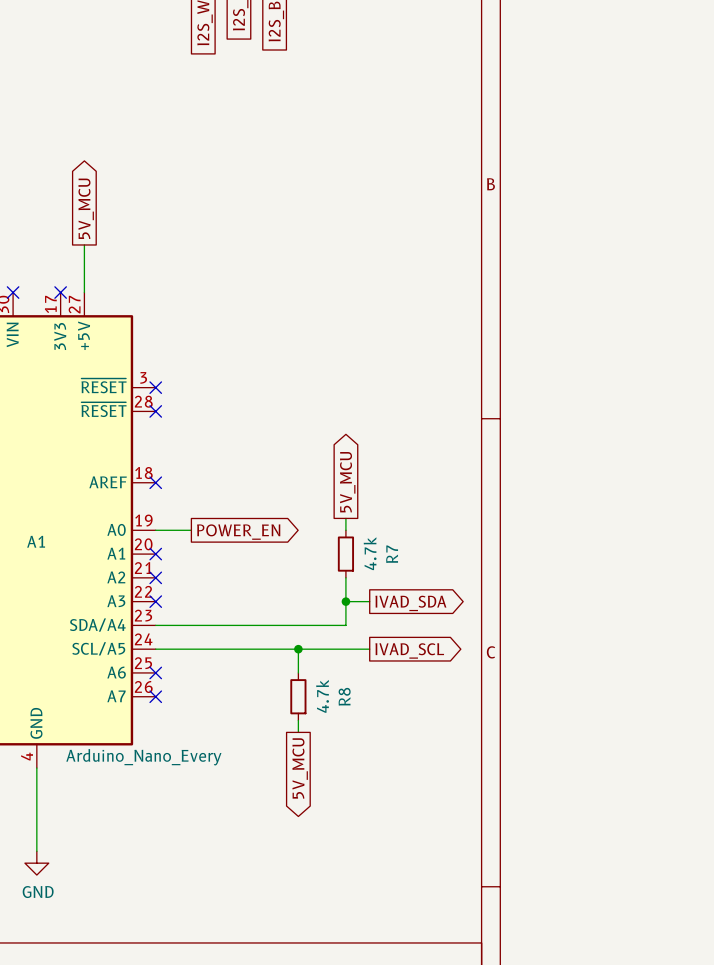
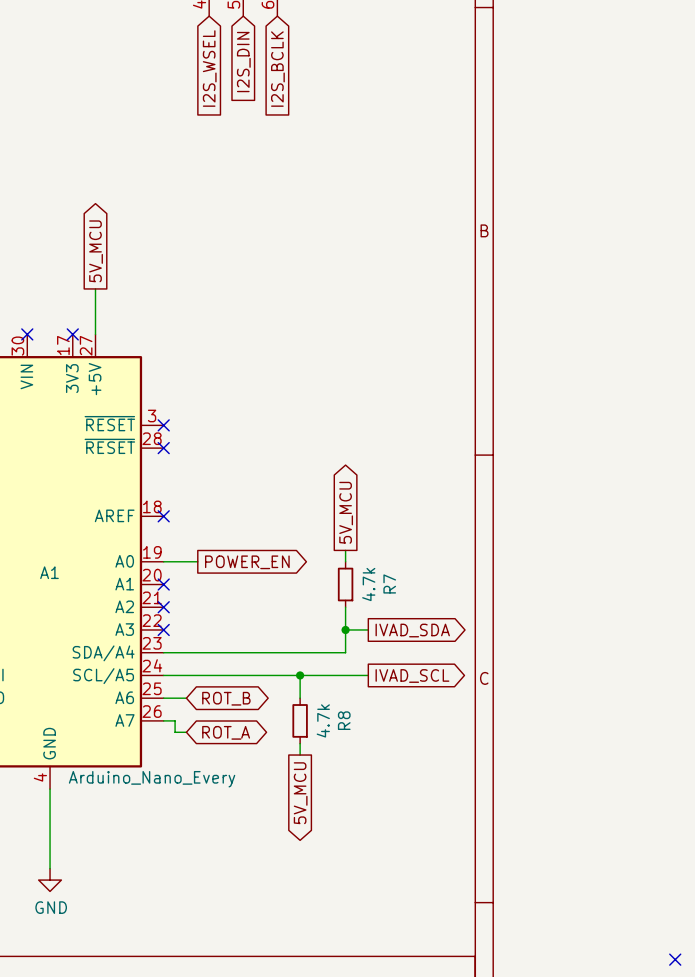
wire: none -> (163, 698) (186, 698)
no-connect mark: (155, 672) -> none
global label: none -> ROT_B (226, 698)
wire: none -> (163, 720) (175, 720) (175, 732) (186, 732)
no-connect mark: (155, 696) -> none
global label: none -> ROT_A (226, 732)
no-connect mark: none -> (675, 959)

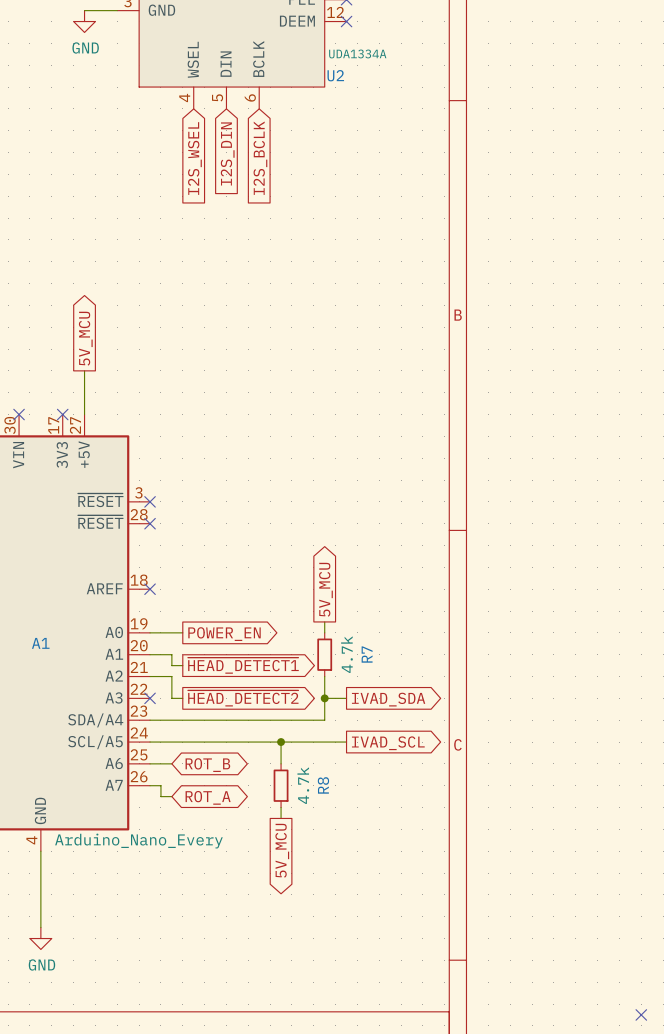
wire: none -> (150, 654) (171, 654) (171, 665) (182, 665)
no-connect mark: (163, 584) -> none
global label: none -> ~{HEAD_DETECT1} (243, 665)
wire: none -> (150, 676) (171, 676) (171, 698) (182, 698)
no-connect mark: (163, 607) -> none
global label: none -> ~{HEAD_DETECT2} (243, 698)

